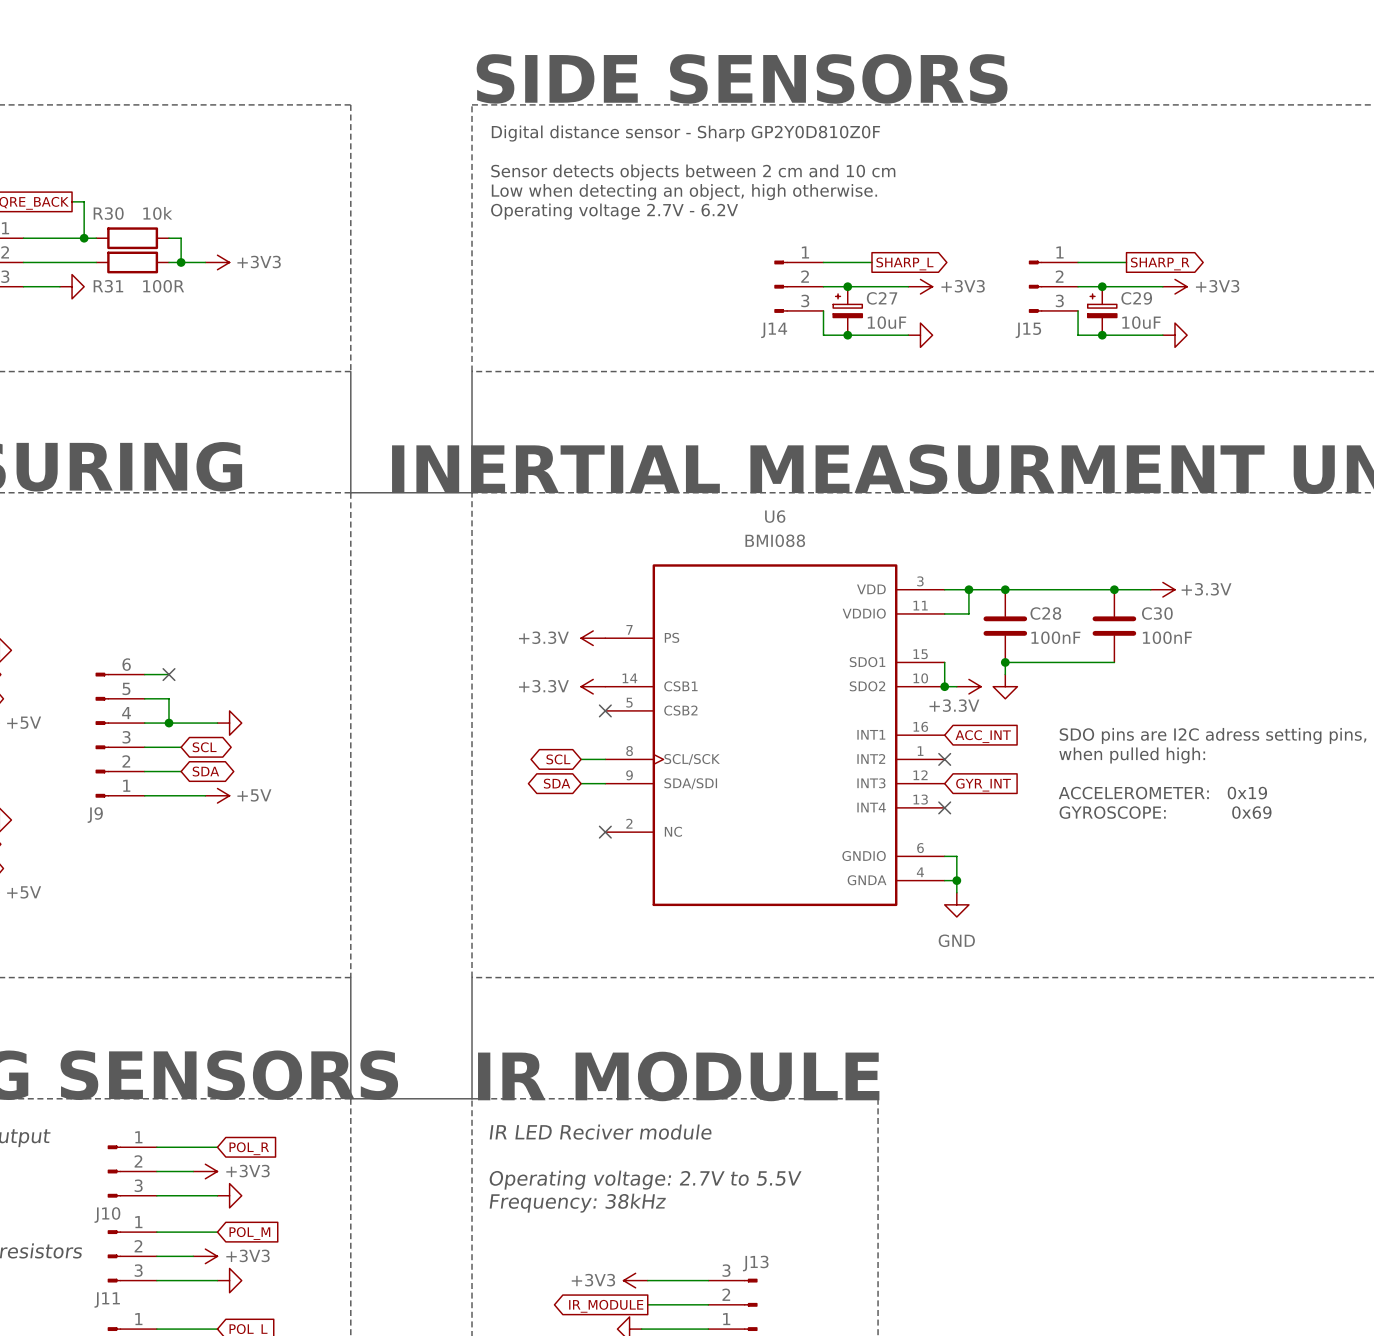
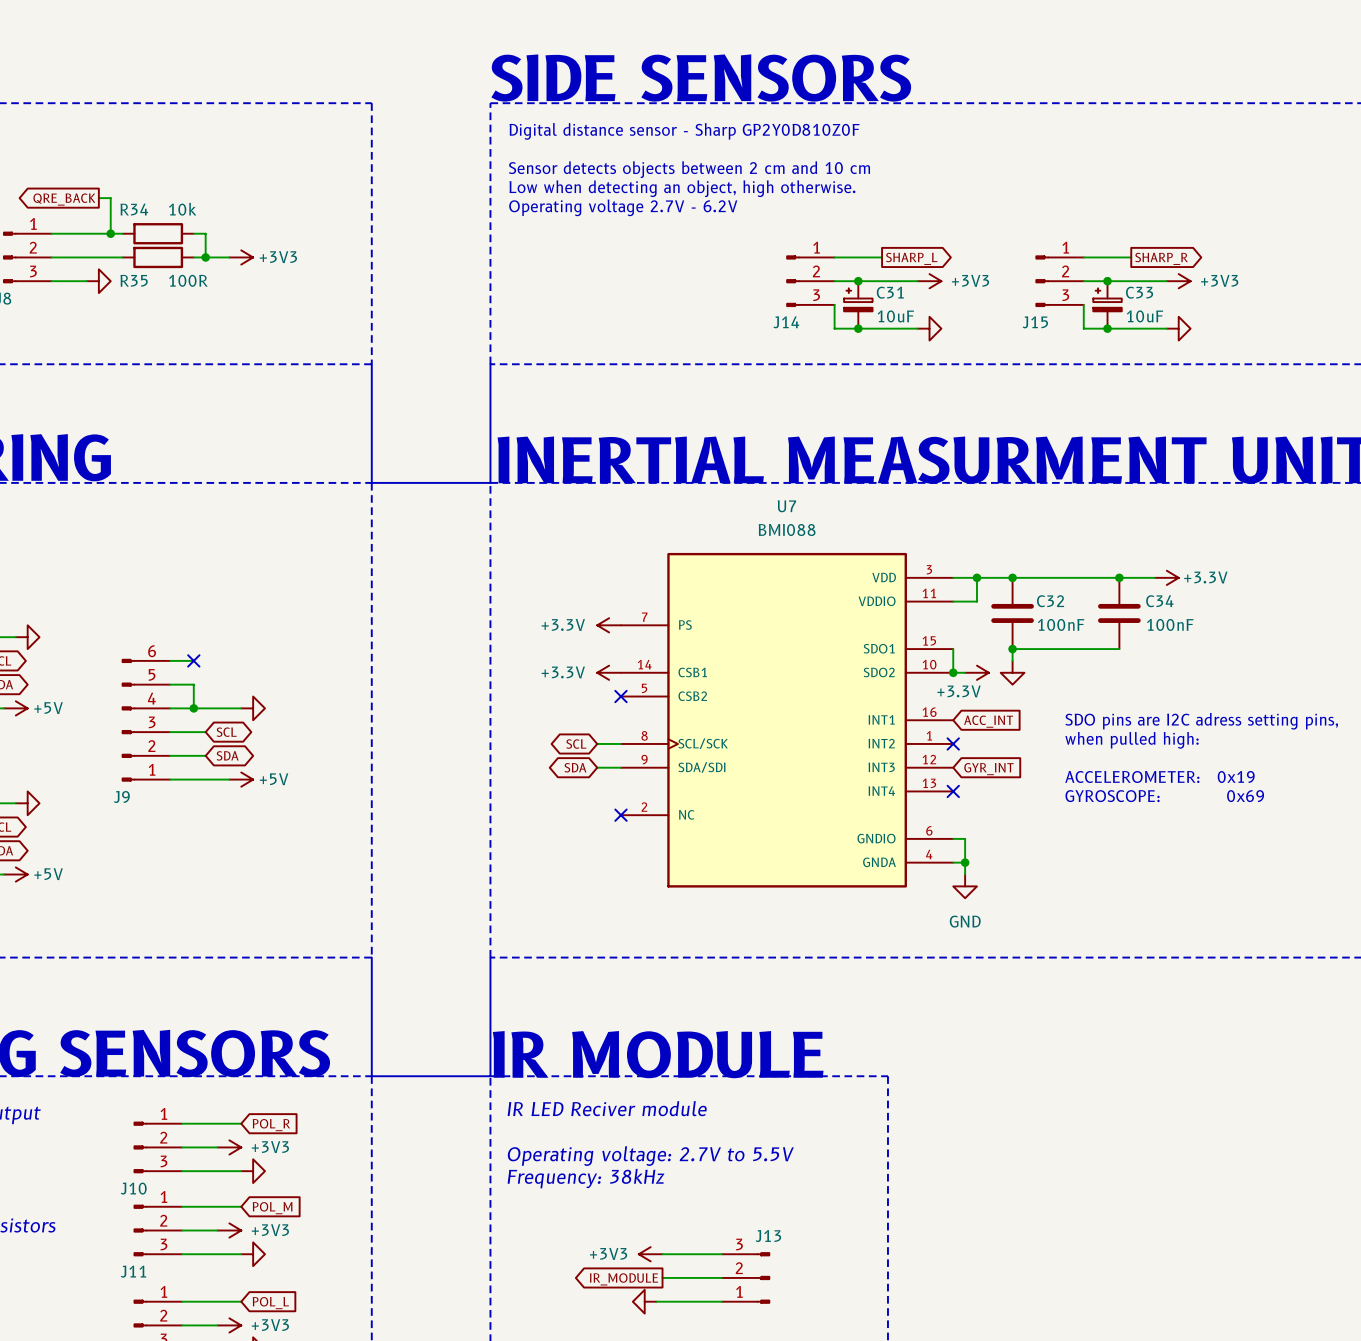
R30 name: R30 (108, 213) -> R34 (134, 209)
R31 name: R31 (108, 286) -> R35 (134, 280)
C27 name: C27 (882, 298) -> C31 (890, 292)
C29 name: C29 (1136, 298) -> C33 (1139, 292)
U6 name: U6 (775, 516) -> U7 (786, 506)
C28 name: C28 (1045, 613) -> C32 (1050, 601)
C30 name: C30 (1157, 613) -> C34 (1159, 601)

